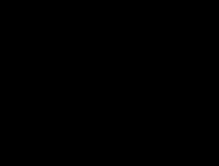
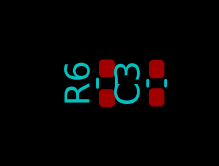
R6: none -> (106, 83)
C3: none -> (156, 83)

